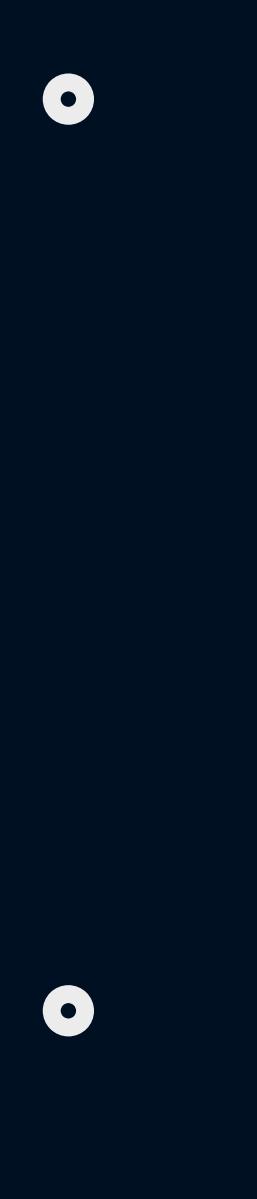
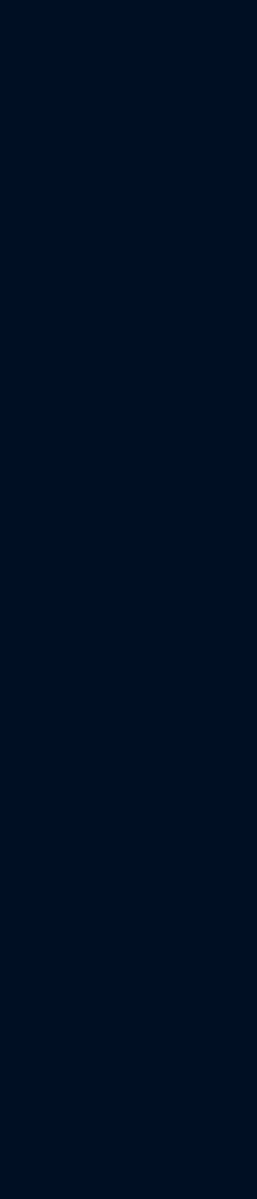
via: (68, 99) -> none
via: (68, 1010) -> none

